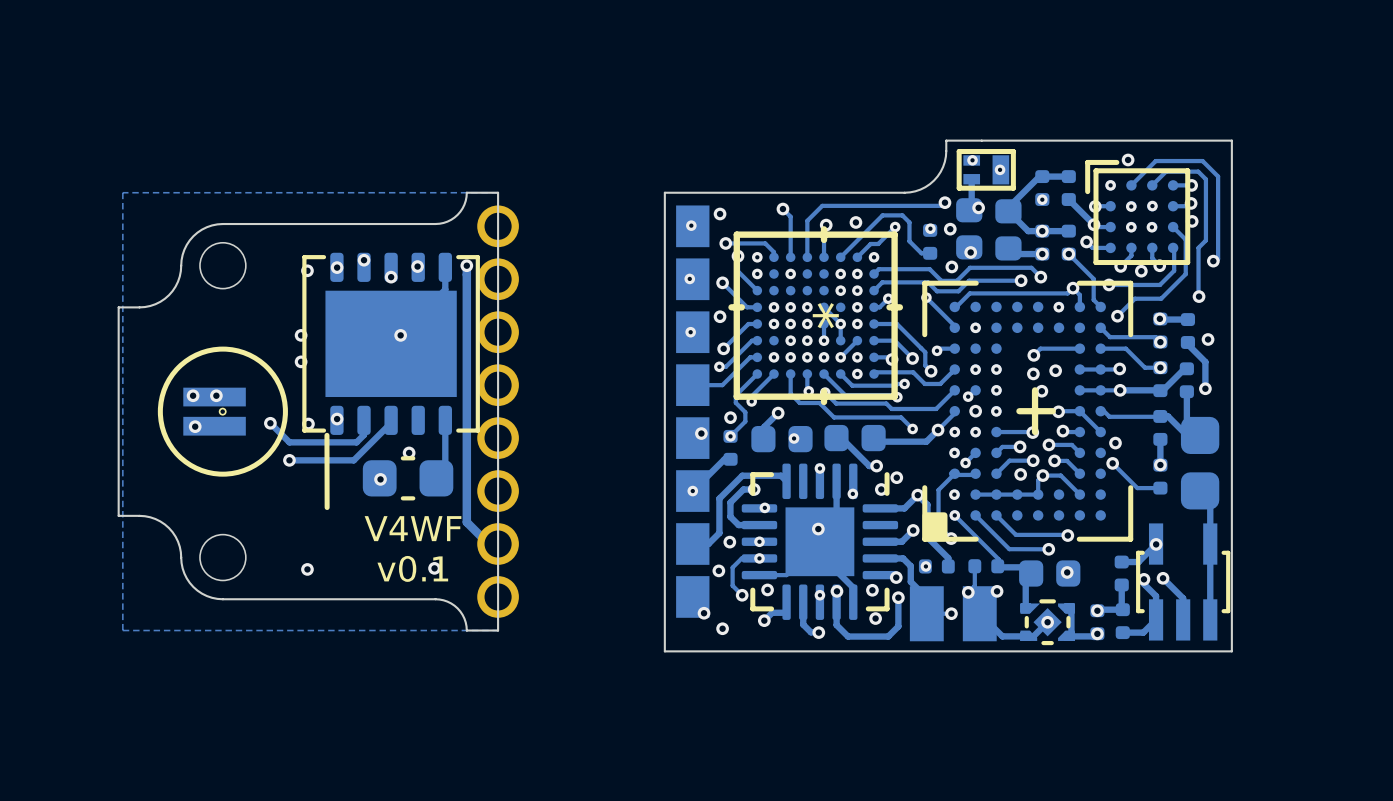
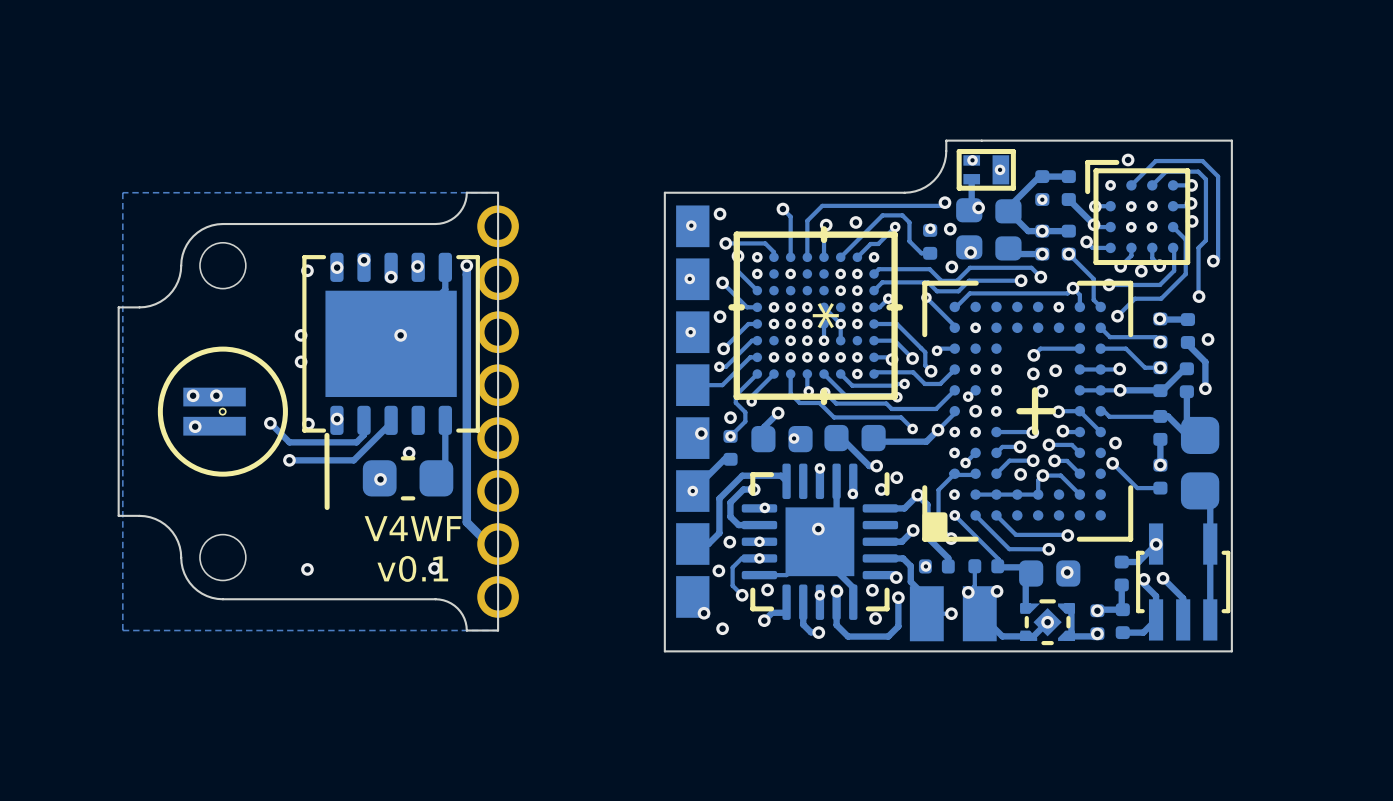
track: (857, 340) (840, 357) -> none

